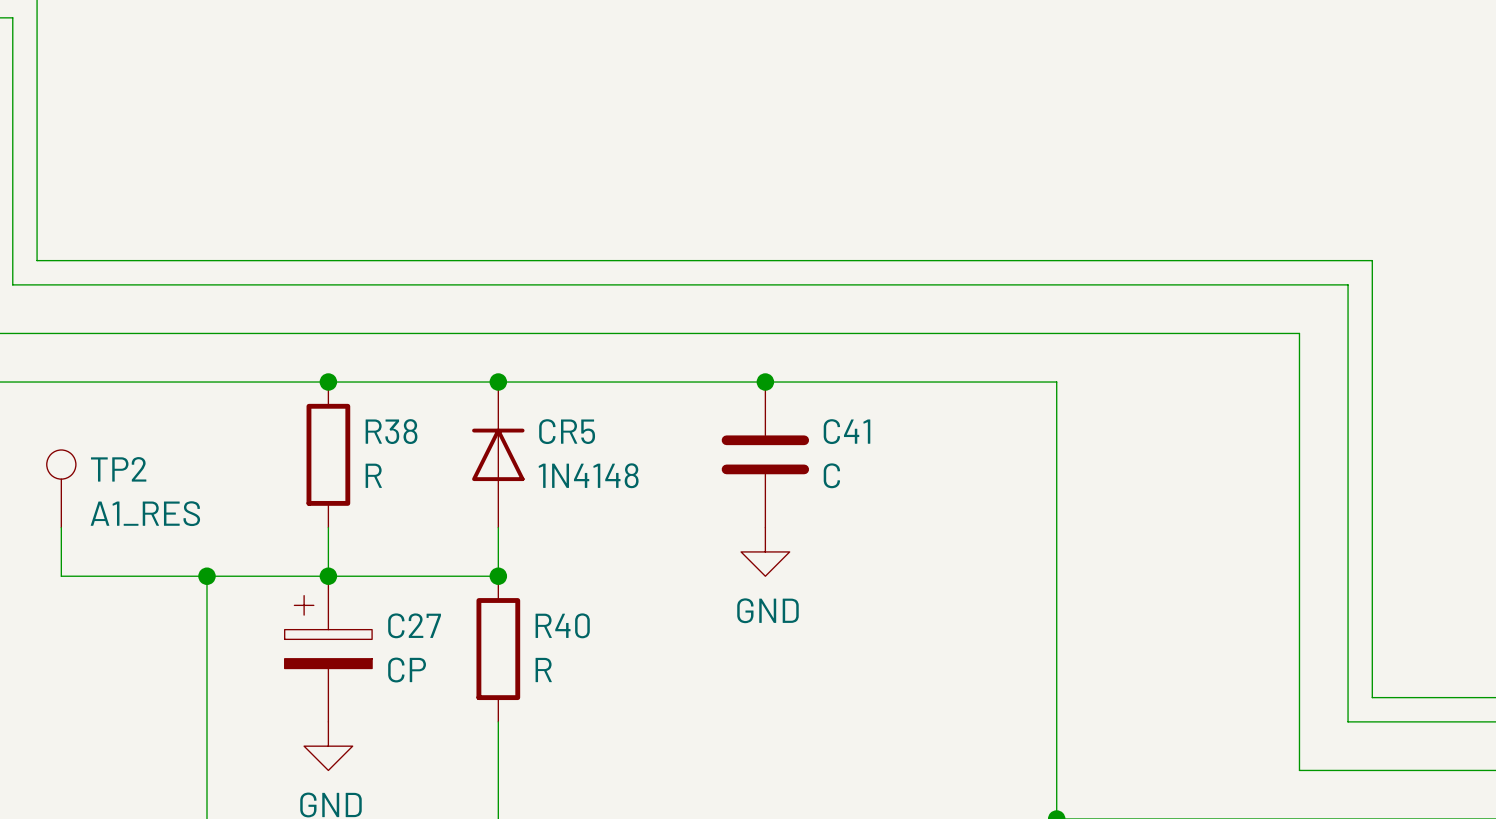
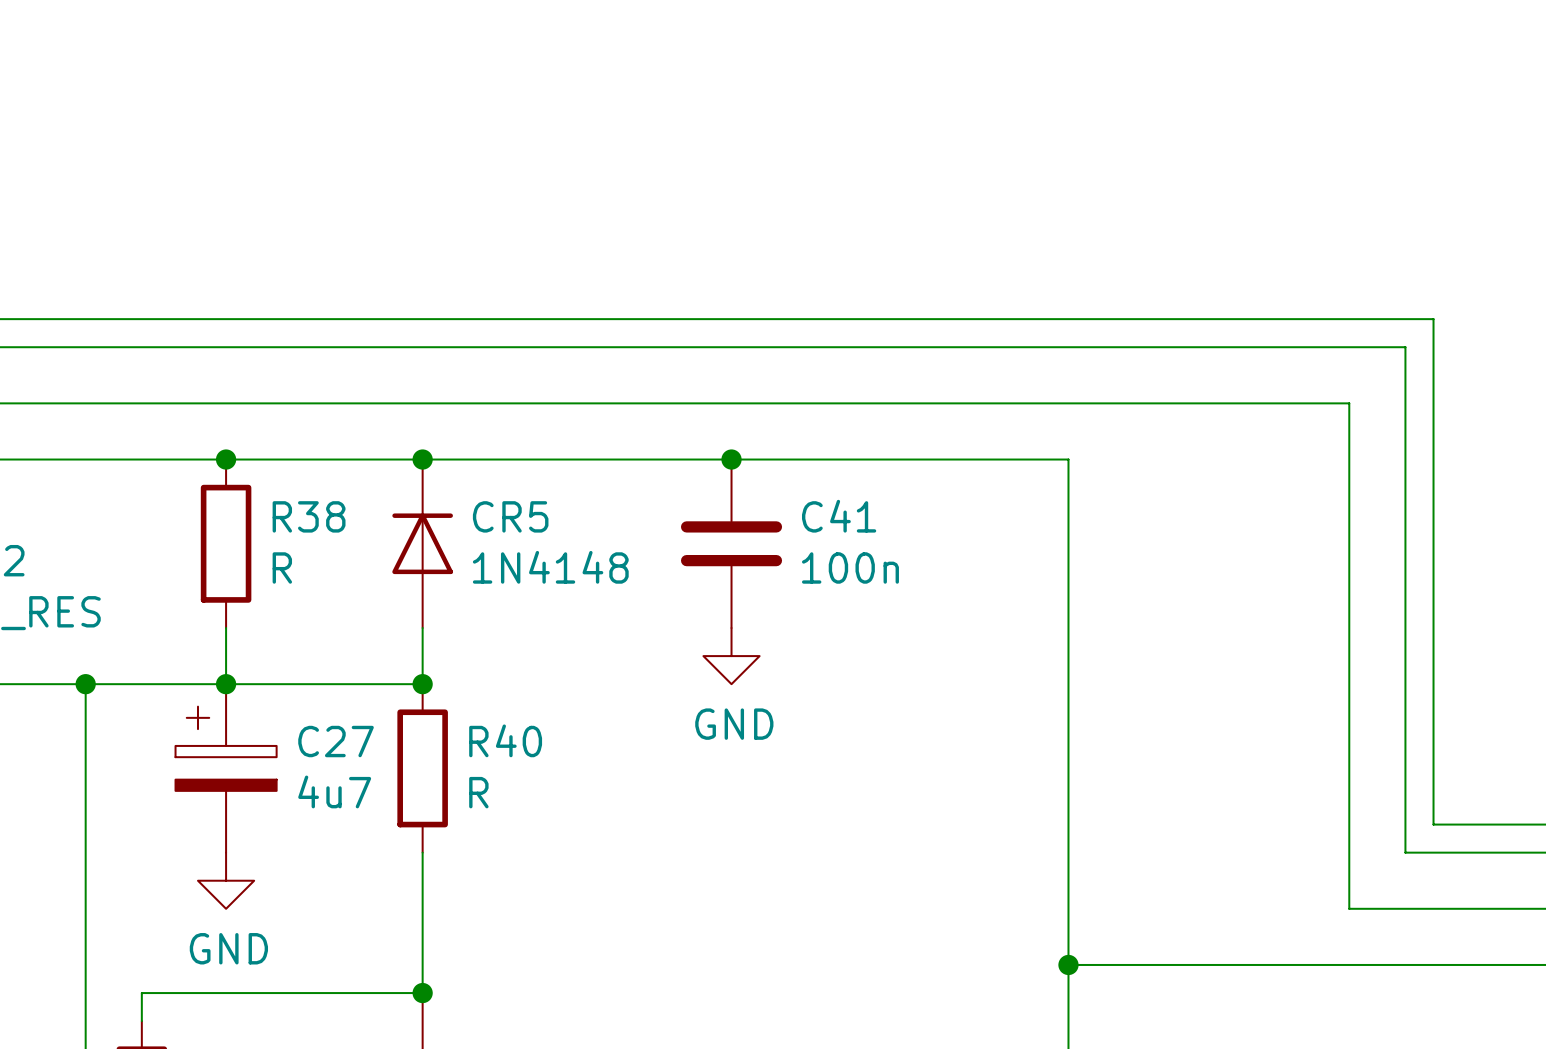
C41 value: C (831, 475) -> 100n (850, 567)
C27 value: CP (407, 670) -> 4u7 (334, 791)

